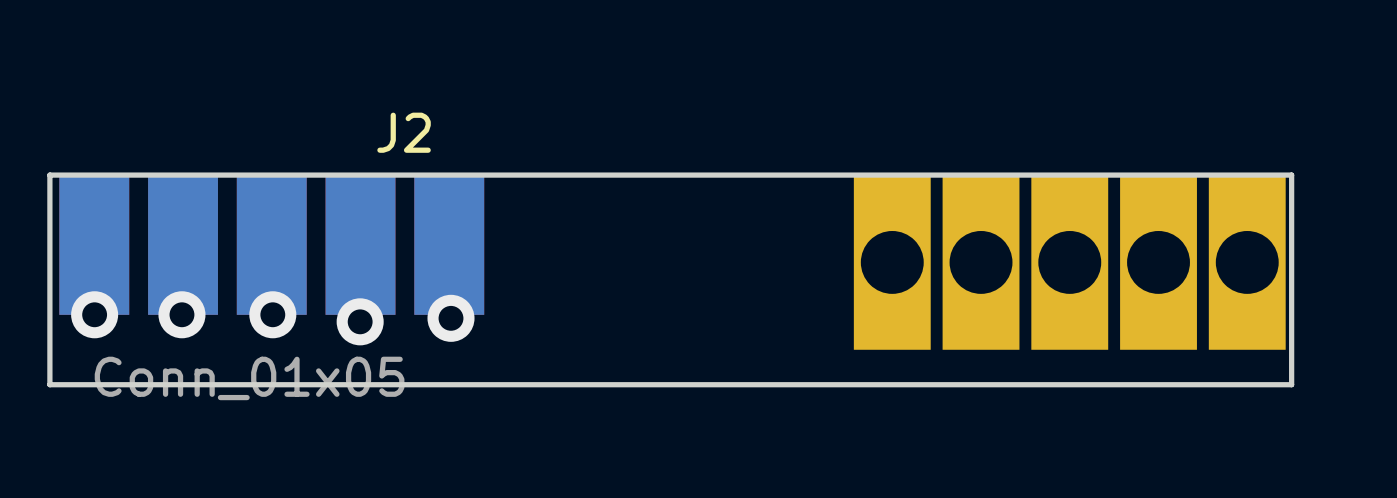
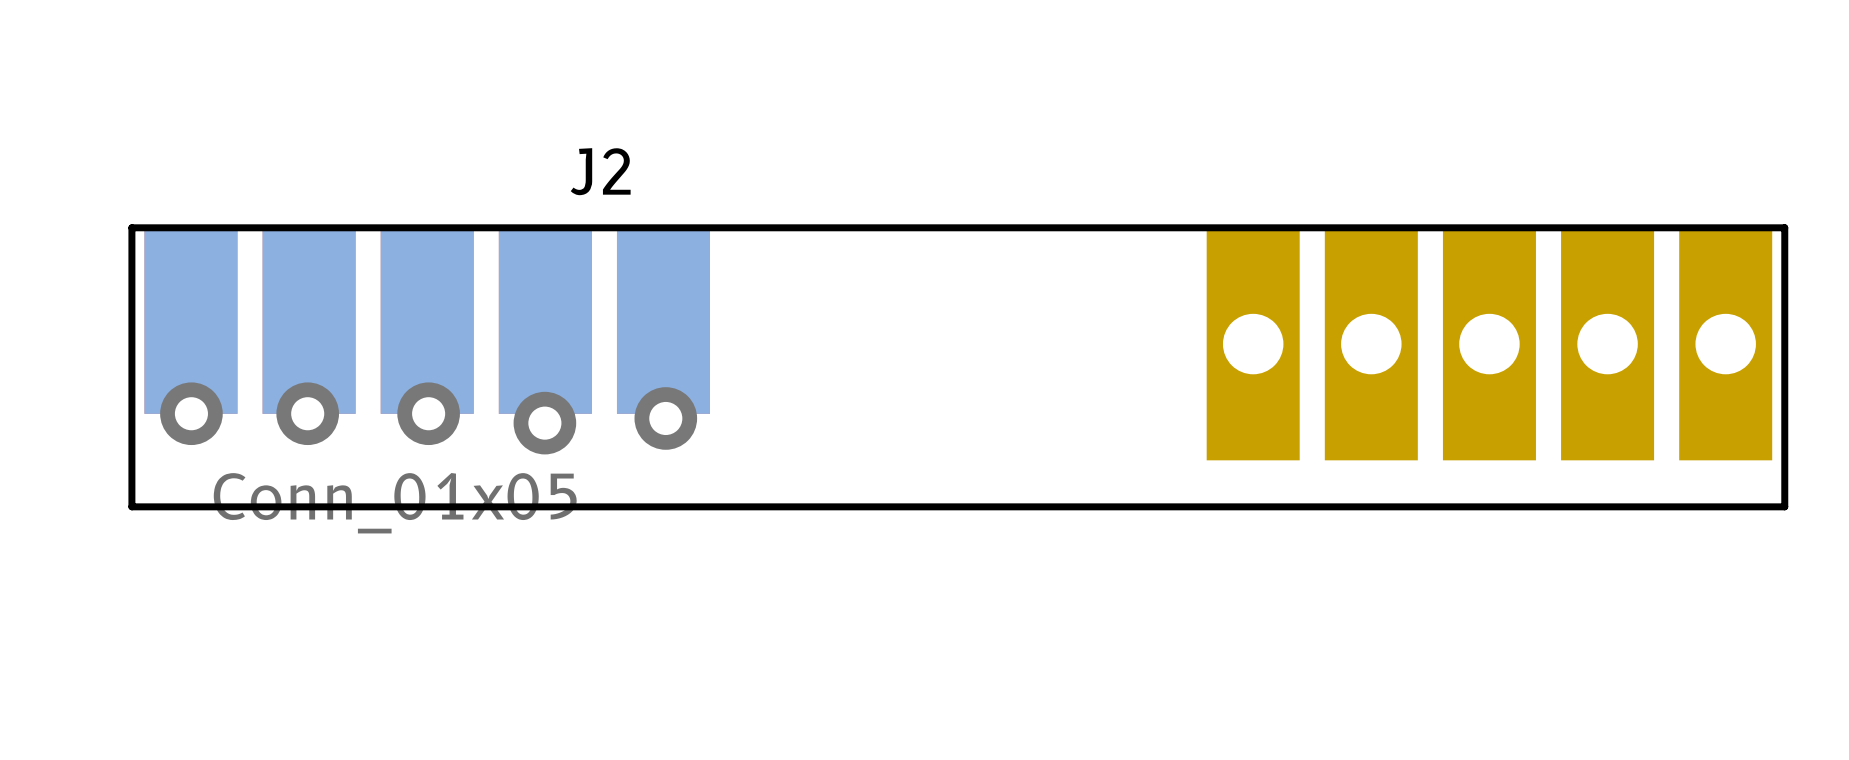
part footprint: [853, 175, 1286, 350] -> [1206, 227, 1773, 461]

